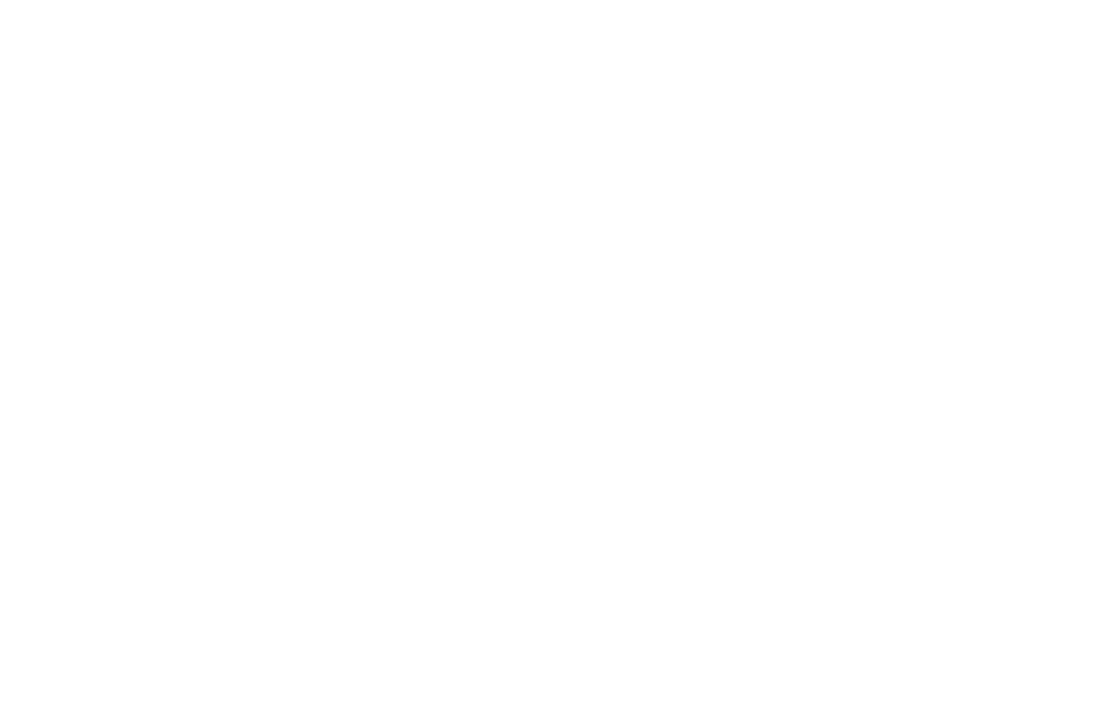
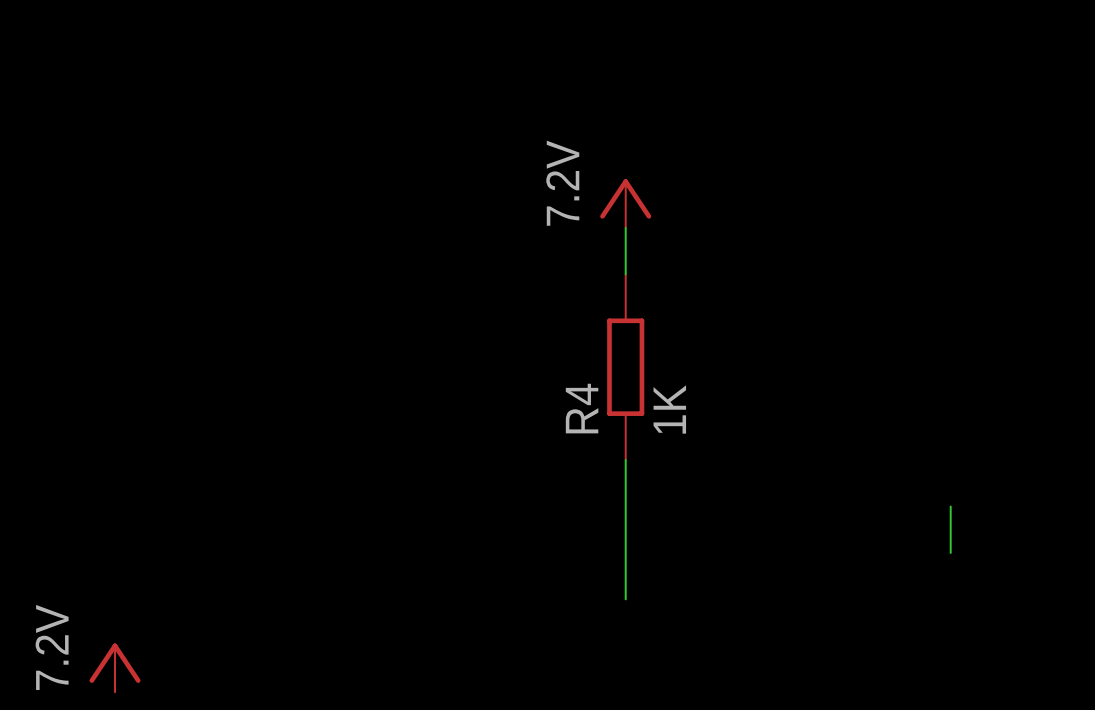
power symbol: none -> 7.2V (625, 203)
wire: none -> (625, 227) (625, 274)
R4: none -> 1K (625, 367)
wire: none -> (625, 460) (625, 599)
wire: none -> (950, 506) (950, 552)
power symbol: none -> 7.2V (115, 667)

